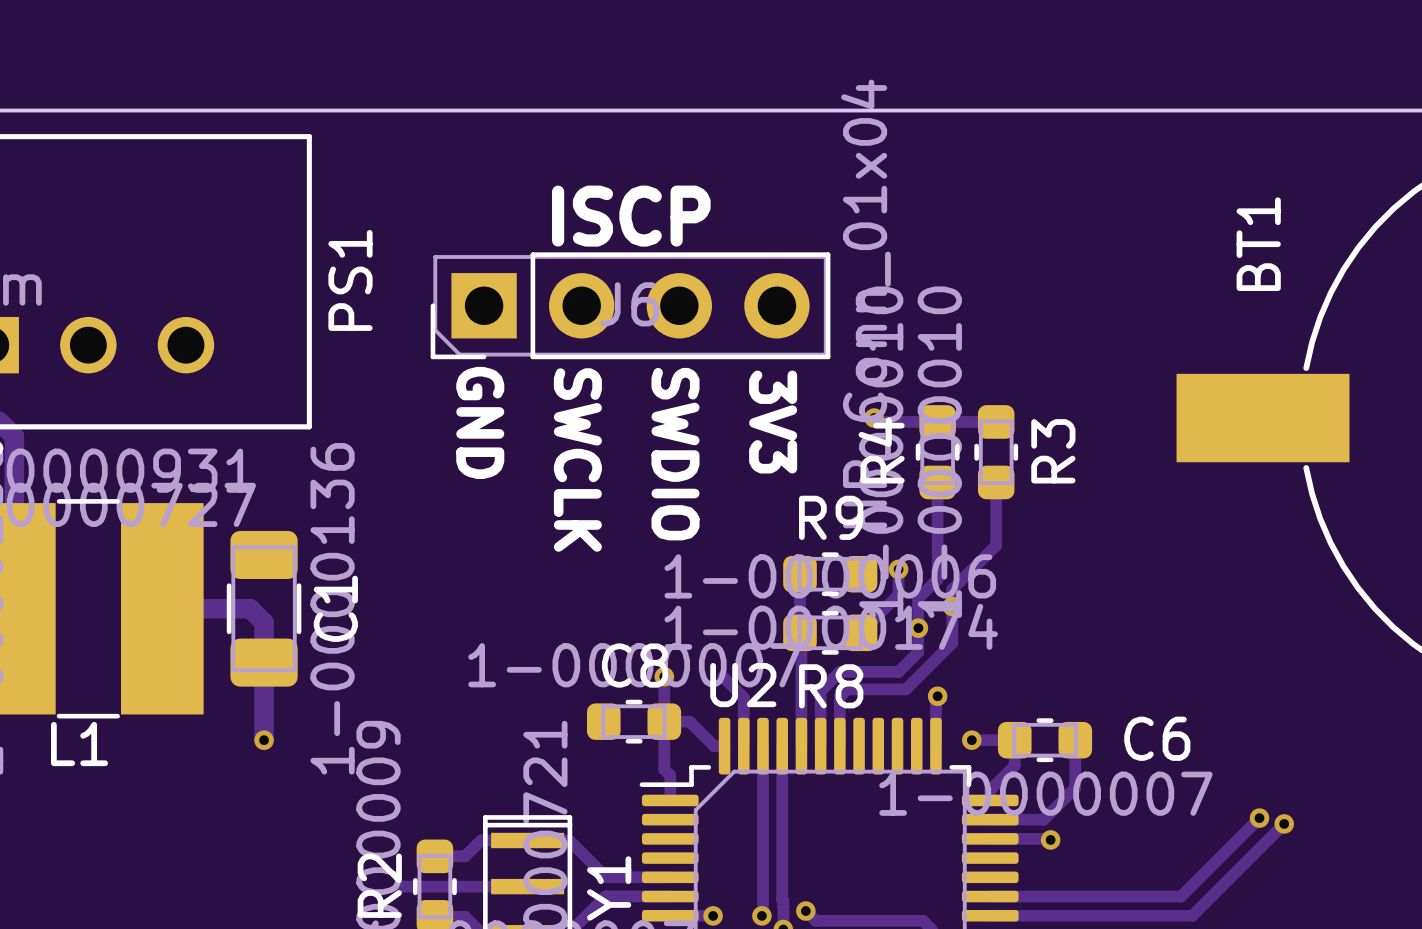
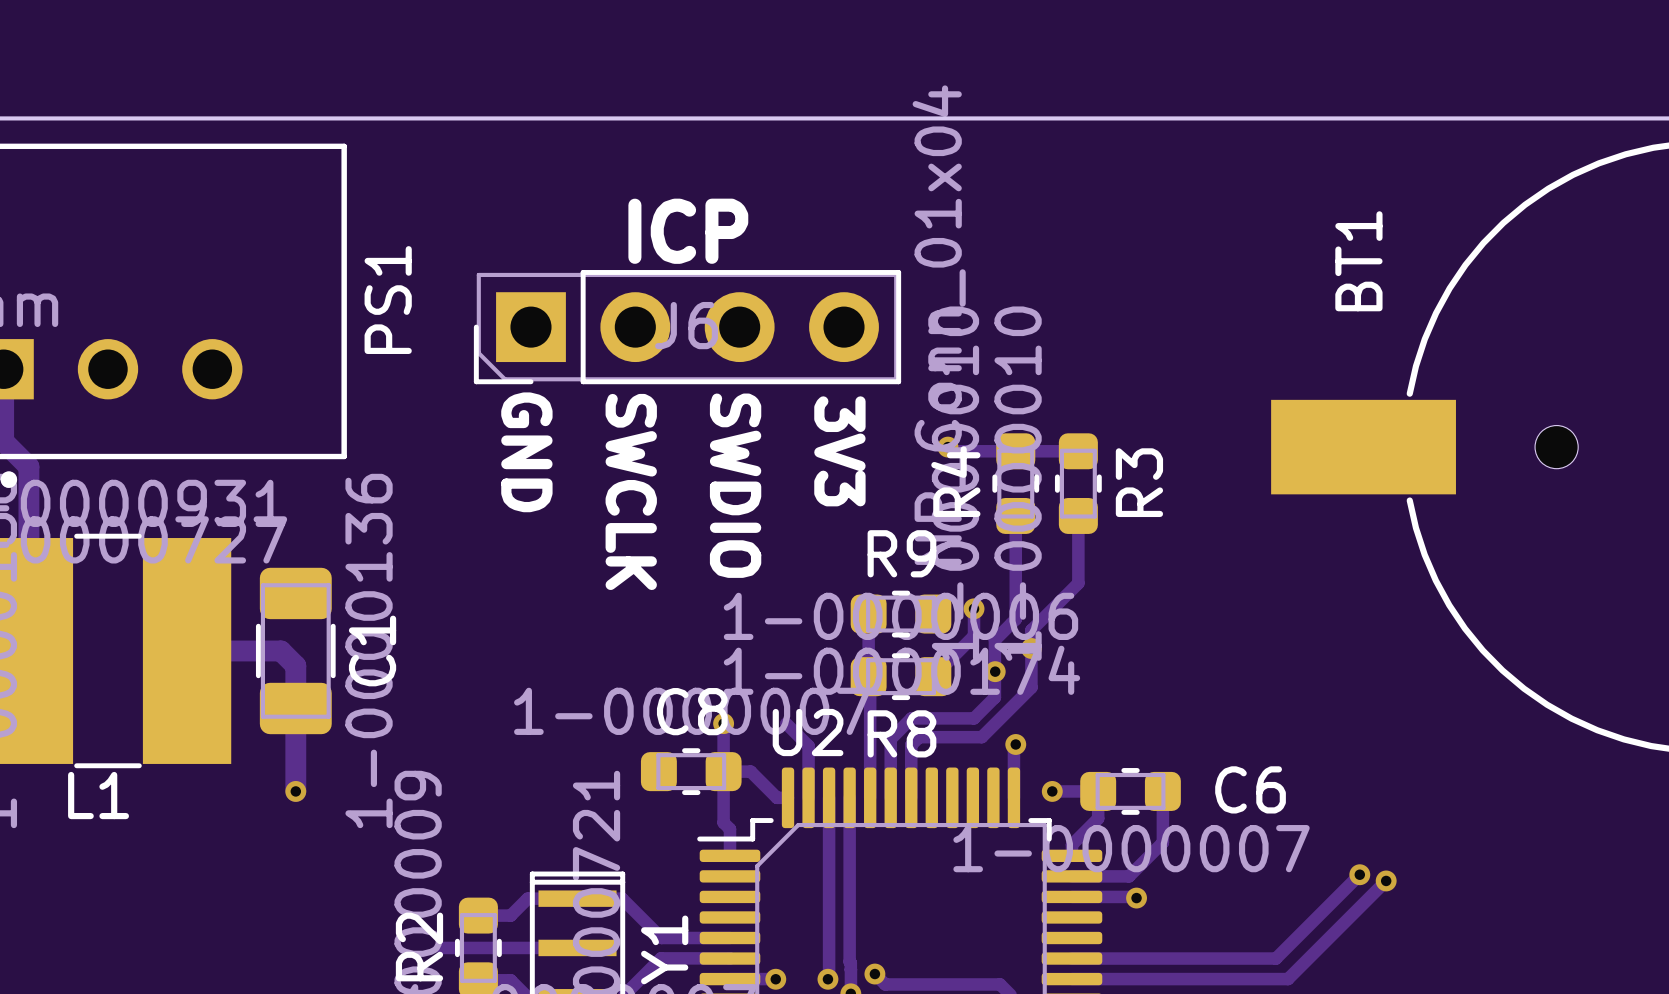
text: ISCP (631, 216) -> ICP (688, 231)

